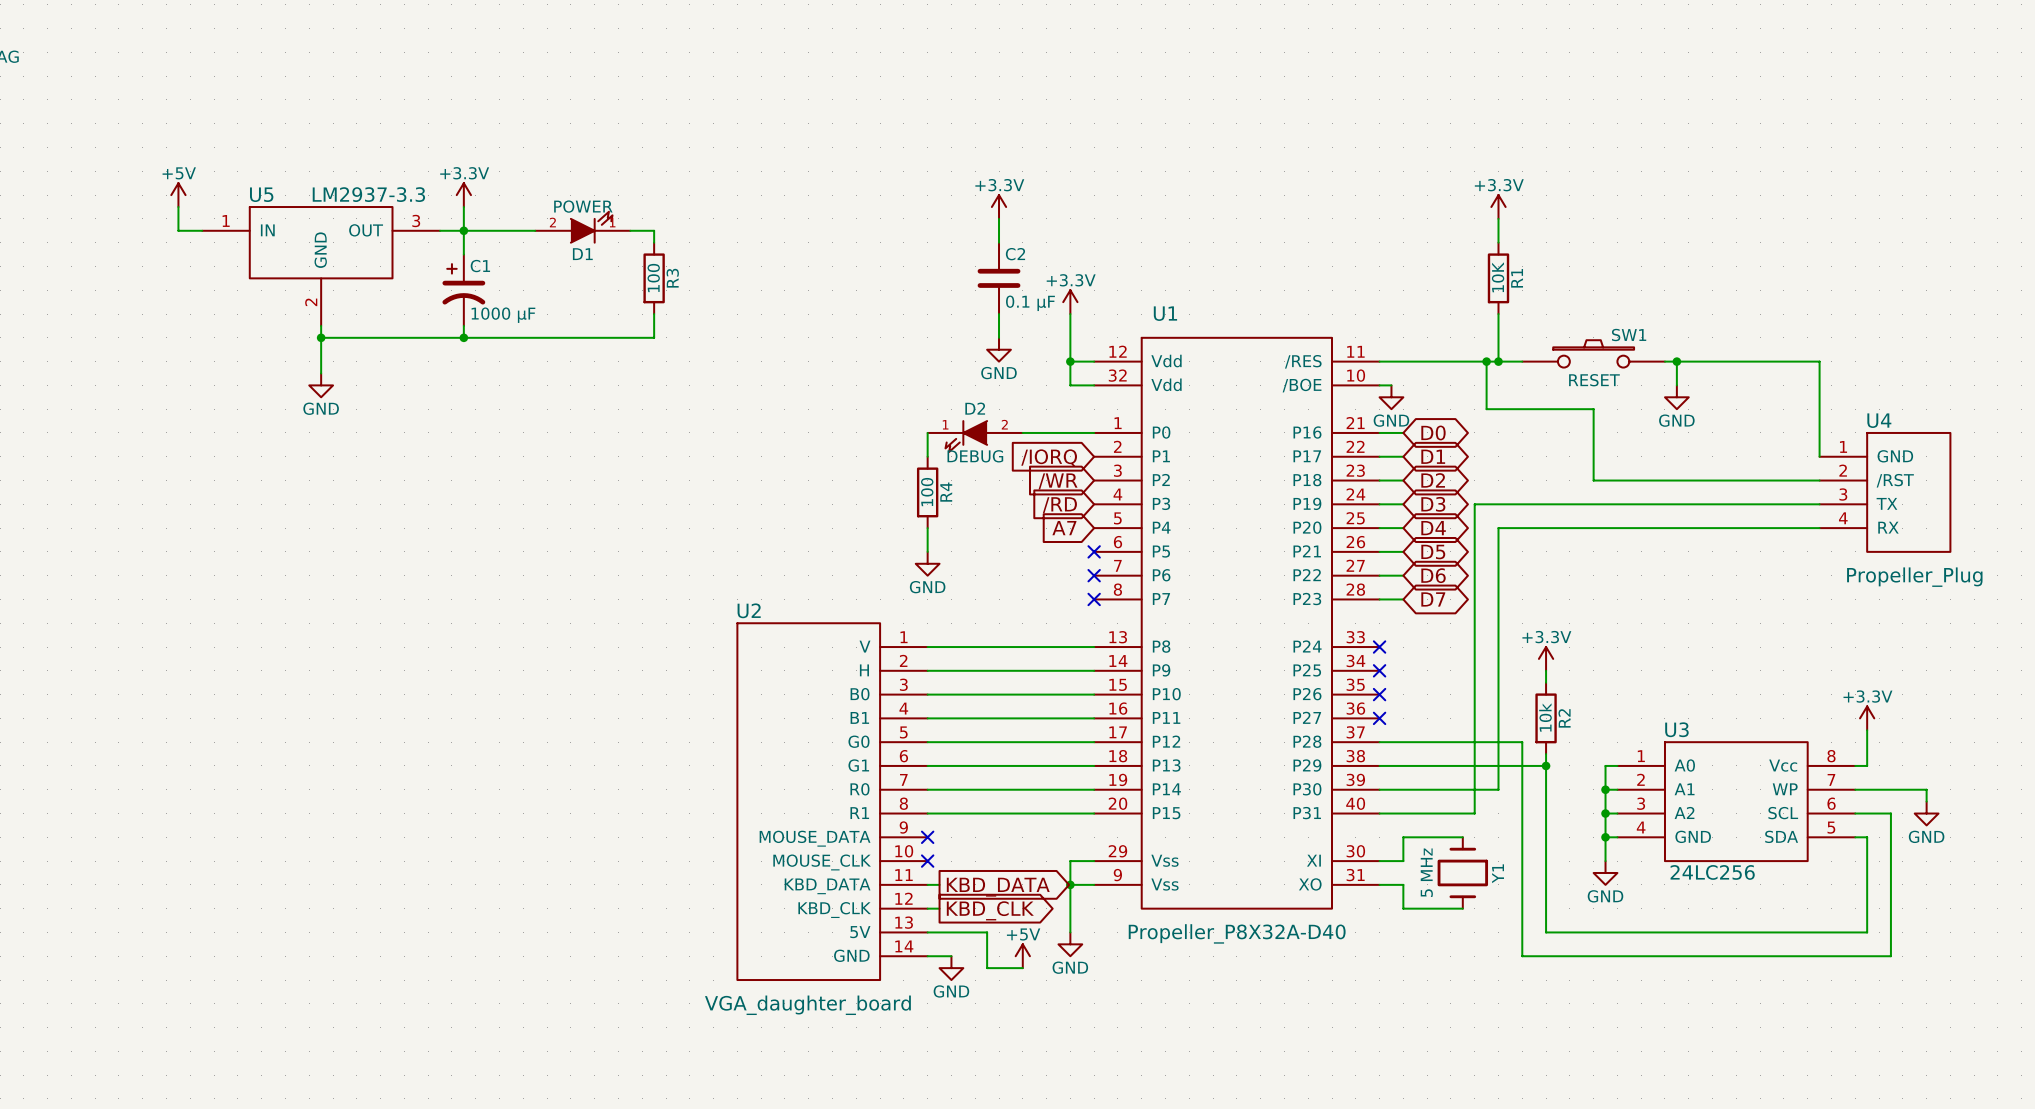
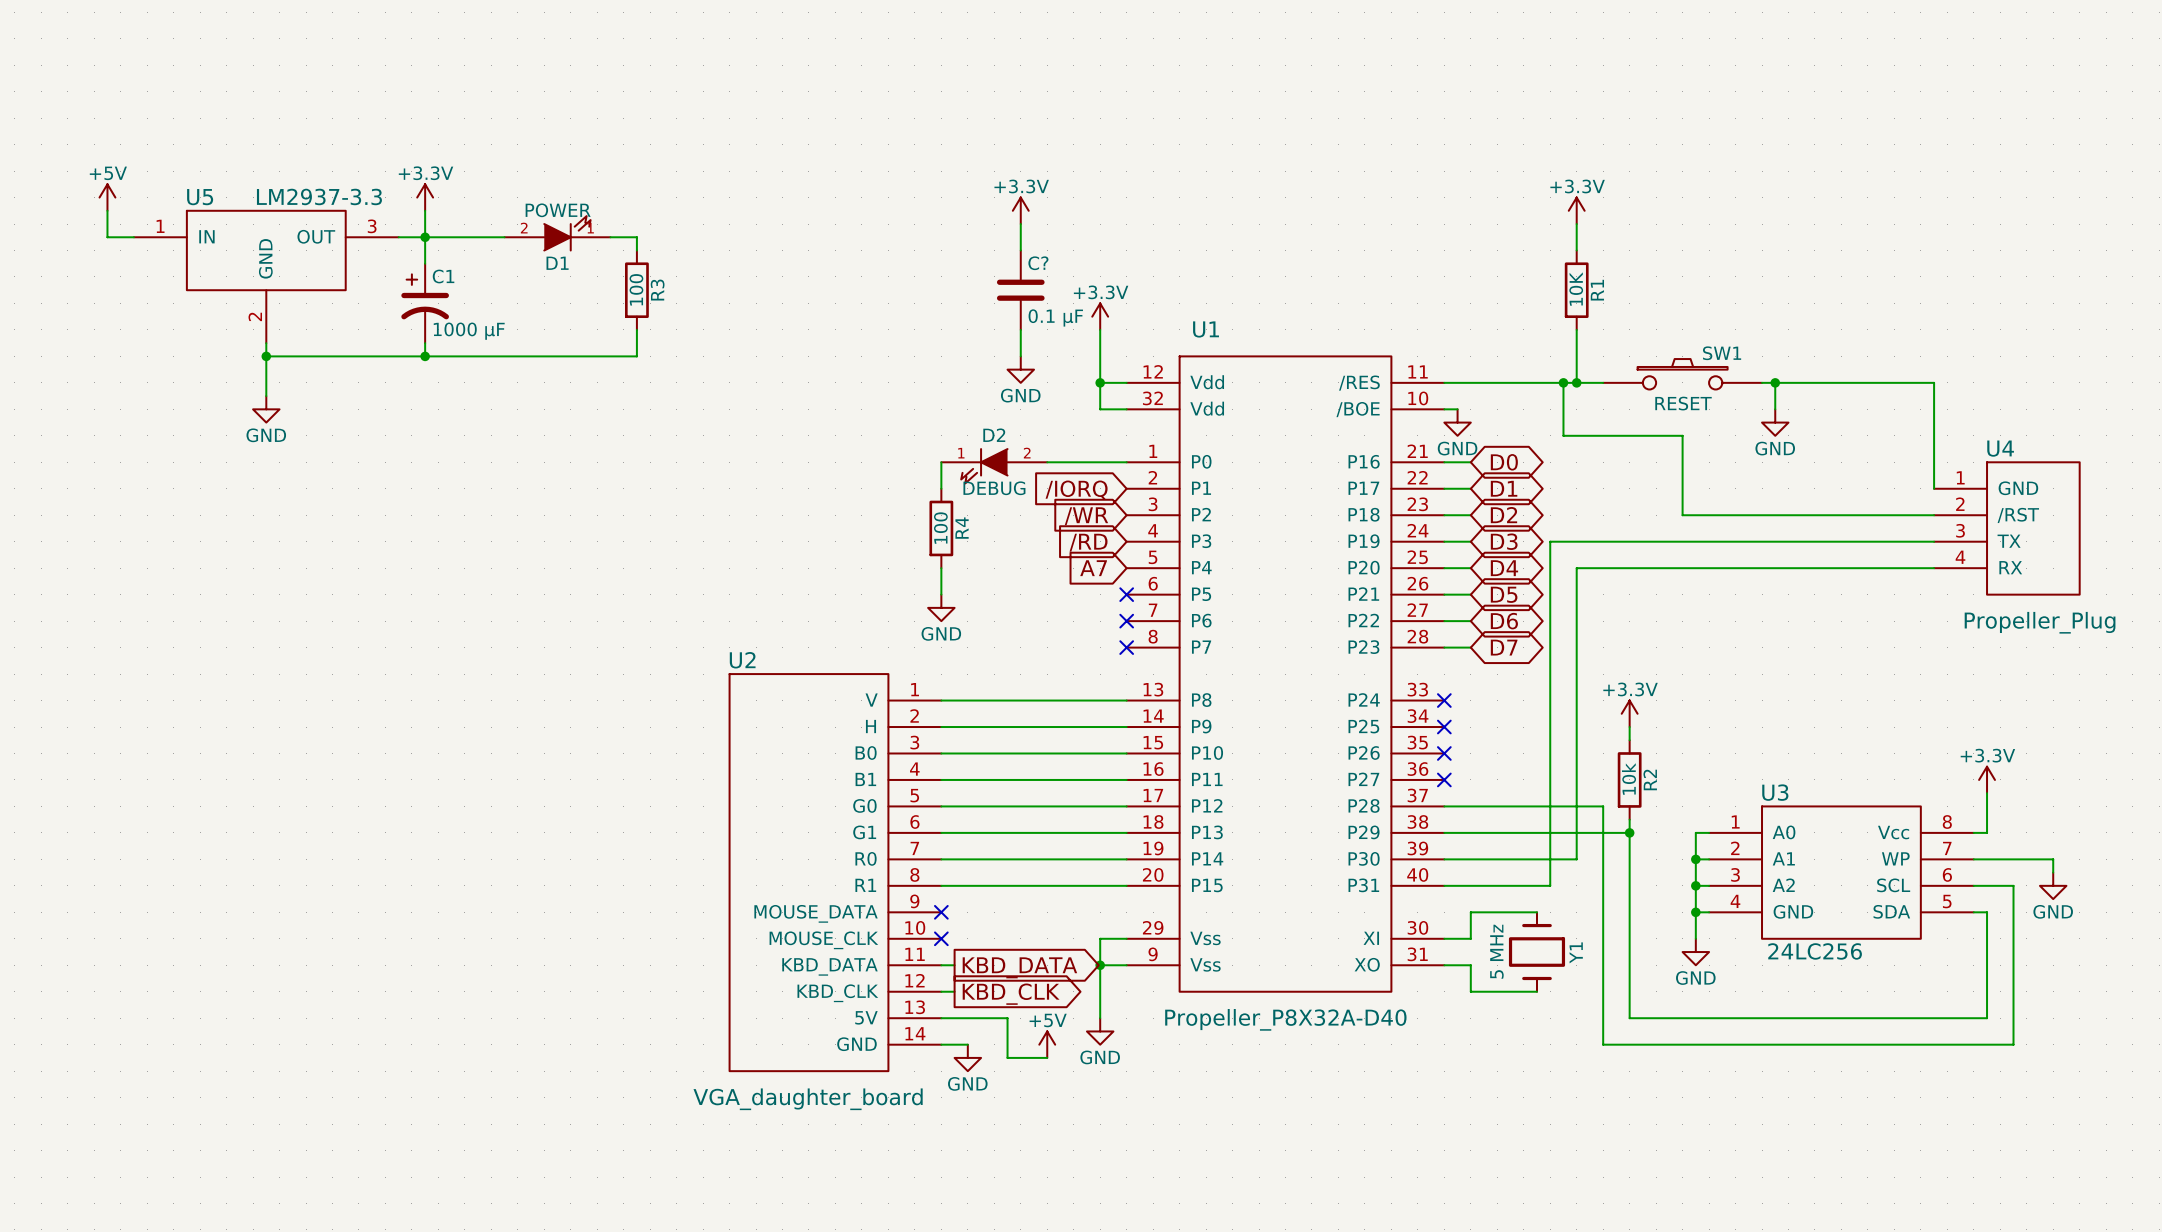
C2 name: C2 (1015, 254) -> C? (1038, 263)

